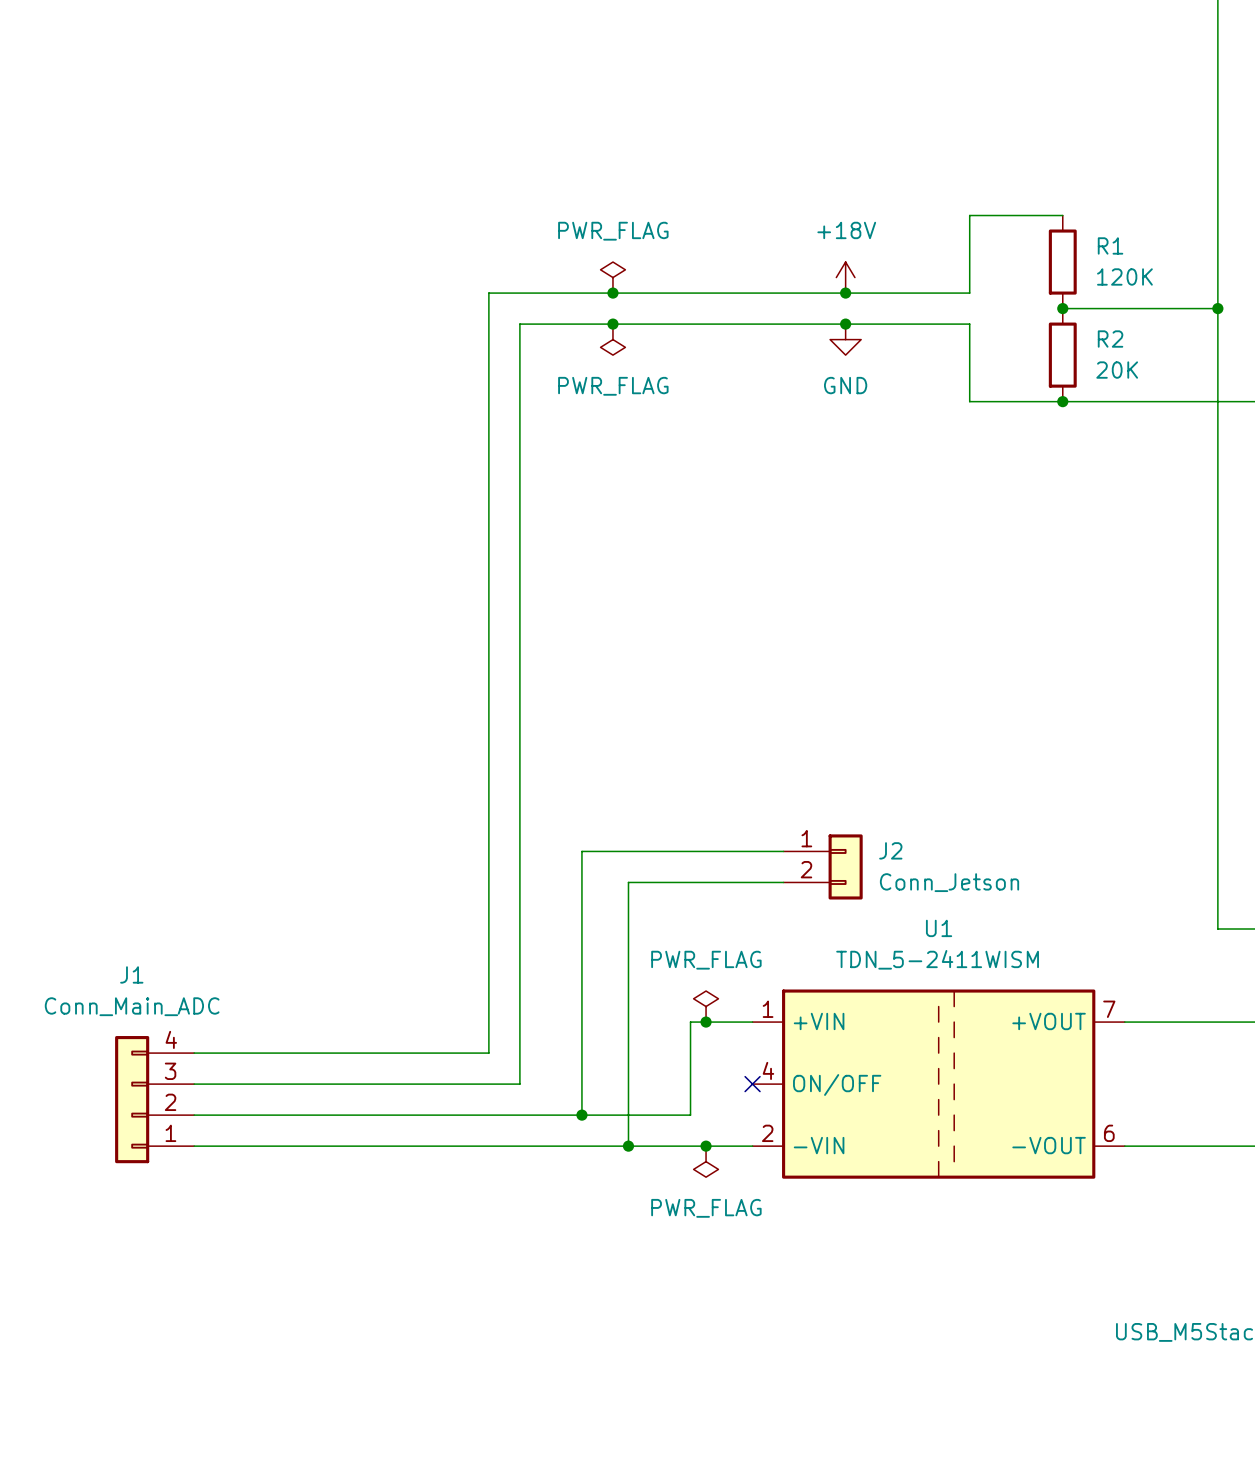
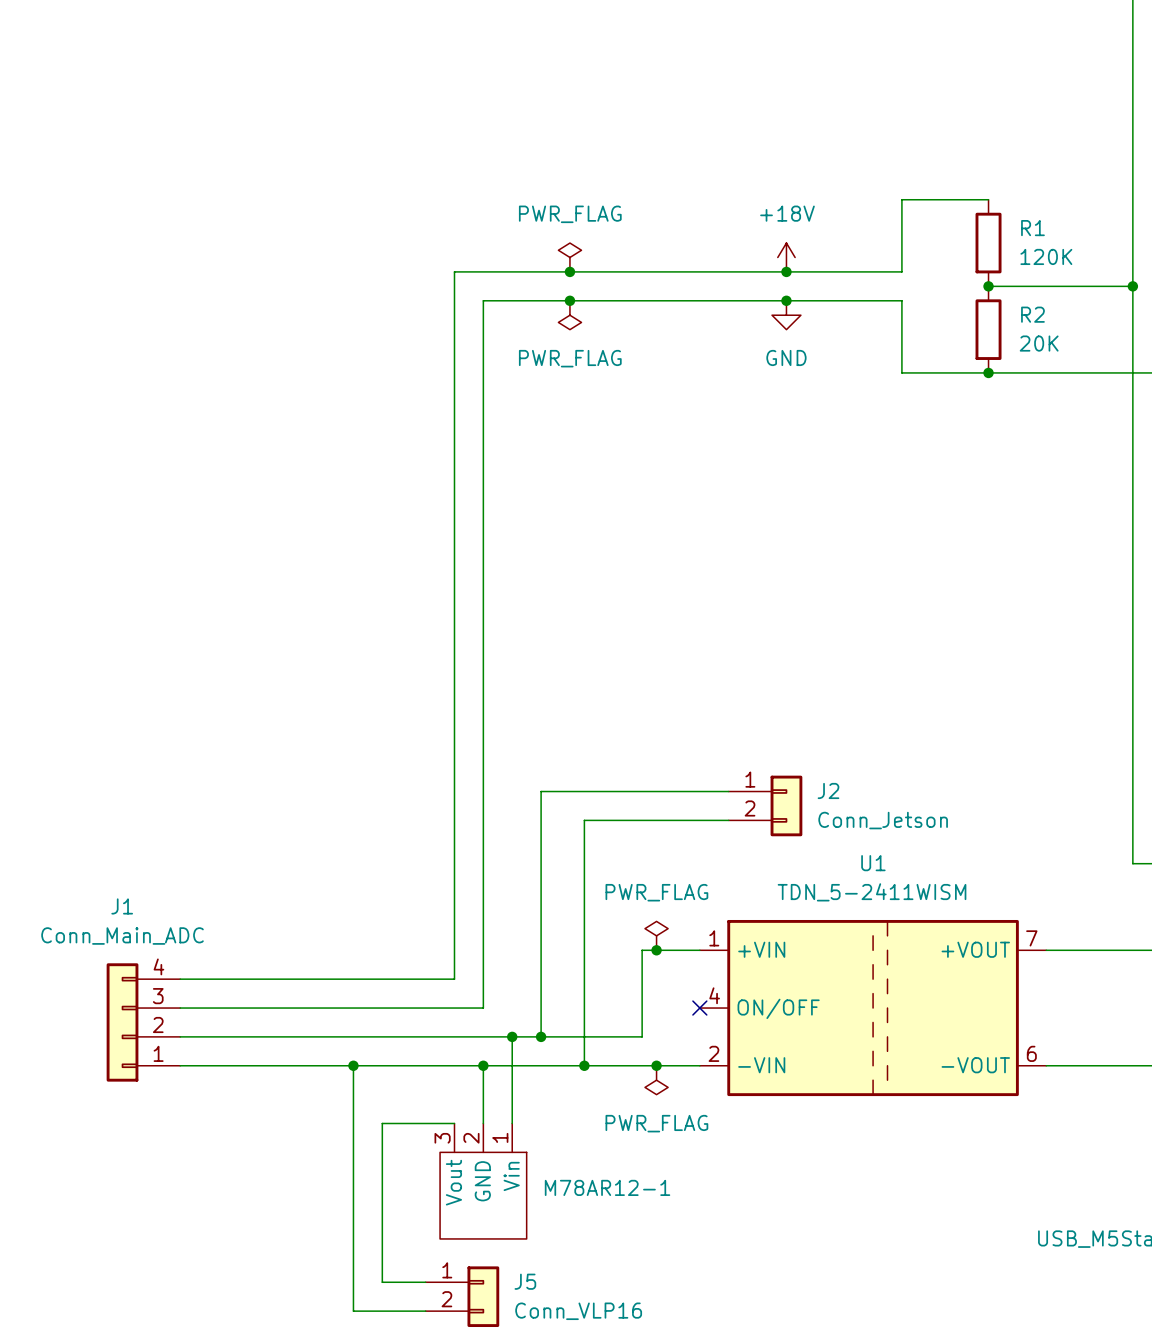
wire: none -> (512, 1036) (512, 1123)
junction: none -> (512, 1036)
wire: none -> (353, 1065) (353, 1311) (425, 1311)
junction: none -> (353, 1065)
wire: none -> (483, 1065) (483, 1123)
junction: none -> (483, 1065)
wire: none -> (454, 1123) (382, 1123) (382, 1282) (425, 1282)
M78AR12-1: none -> (483, 1181)
J5: none -> Conn_VLP16 (462, 1296)

